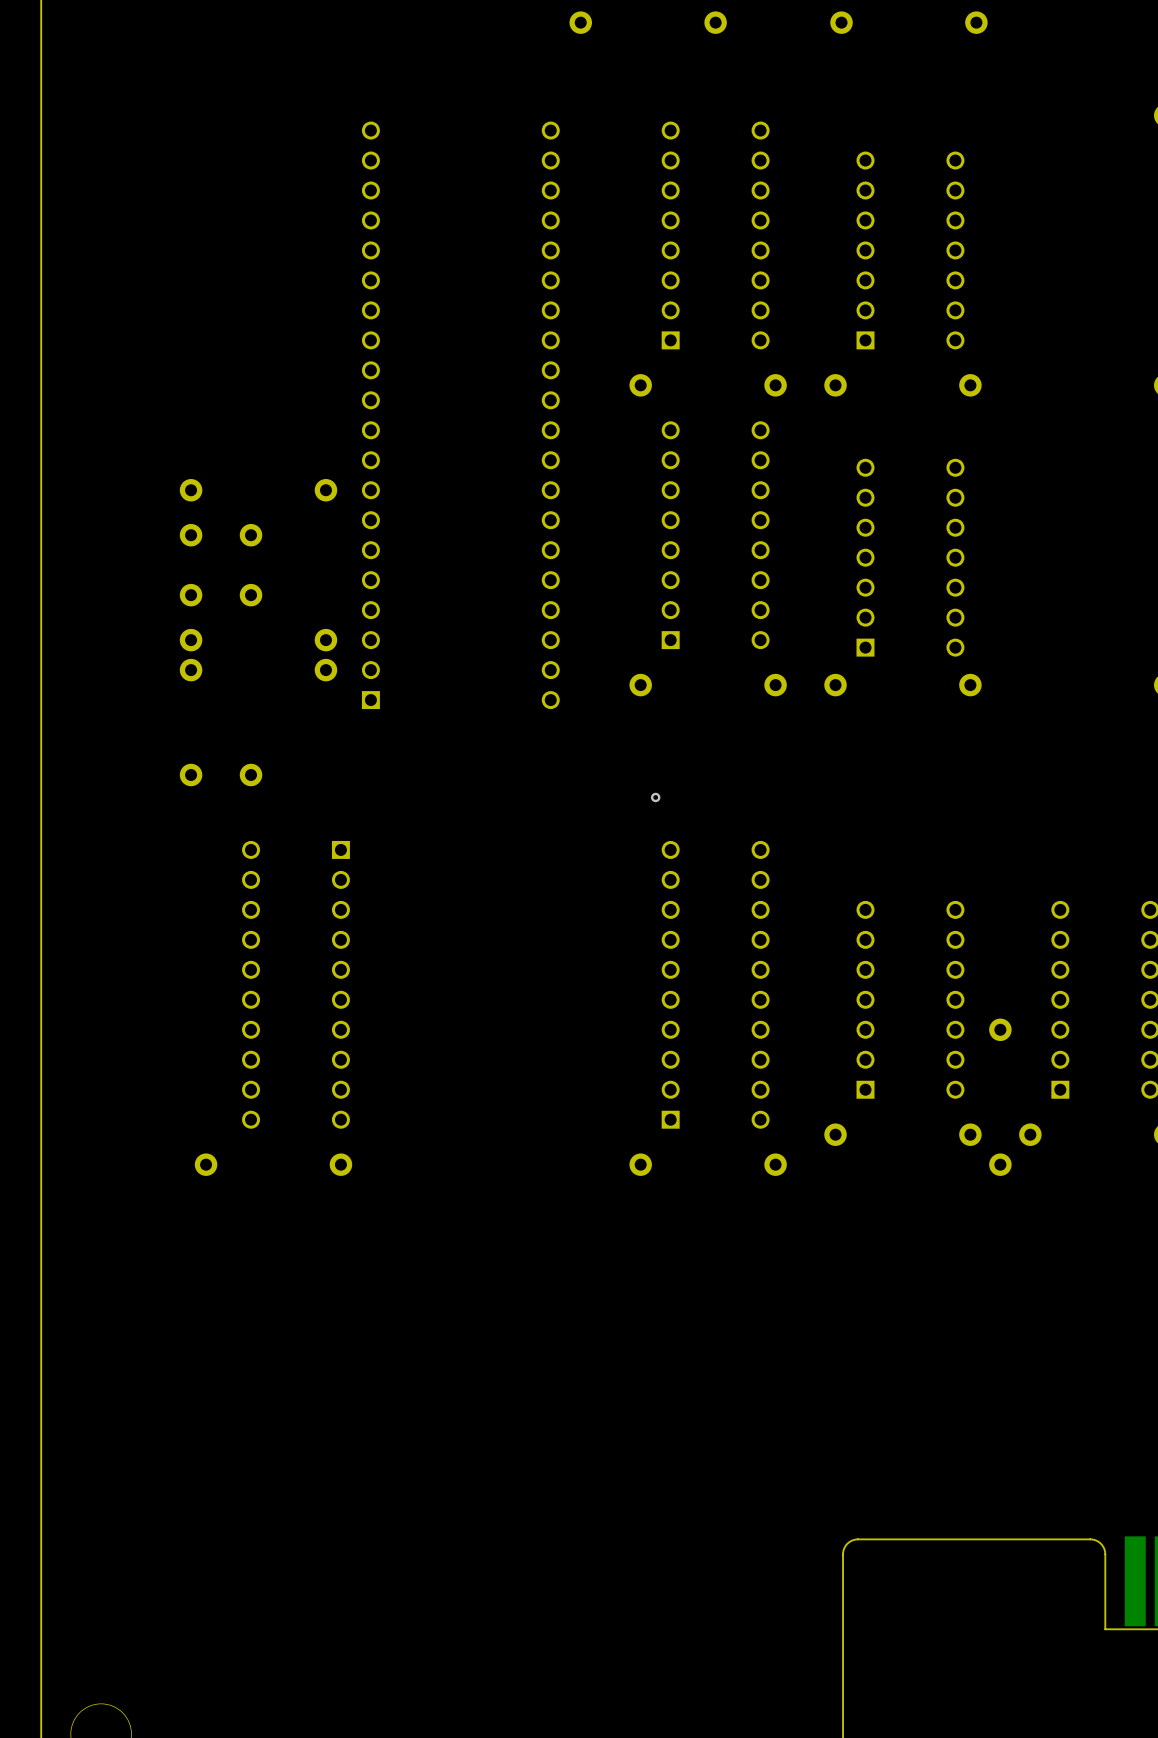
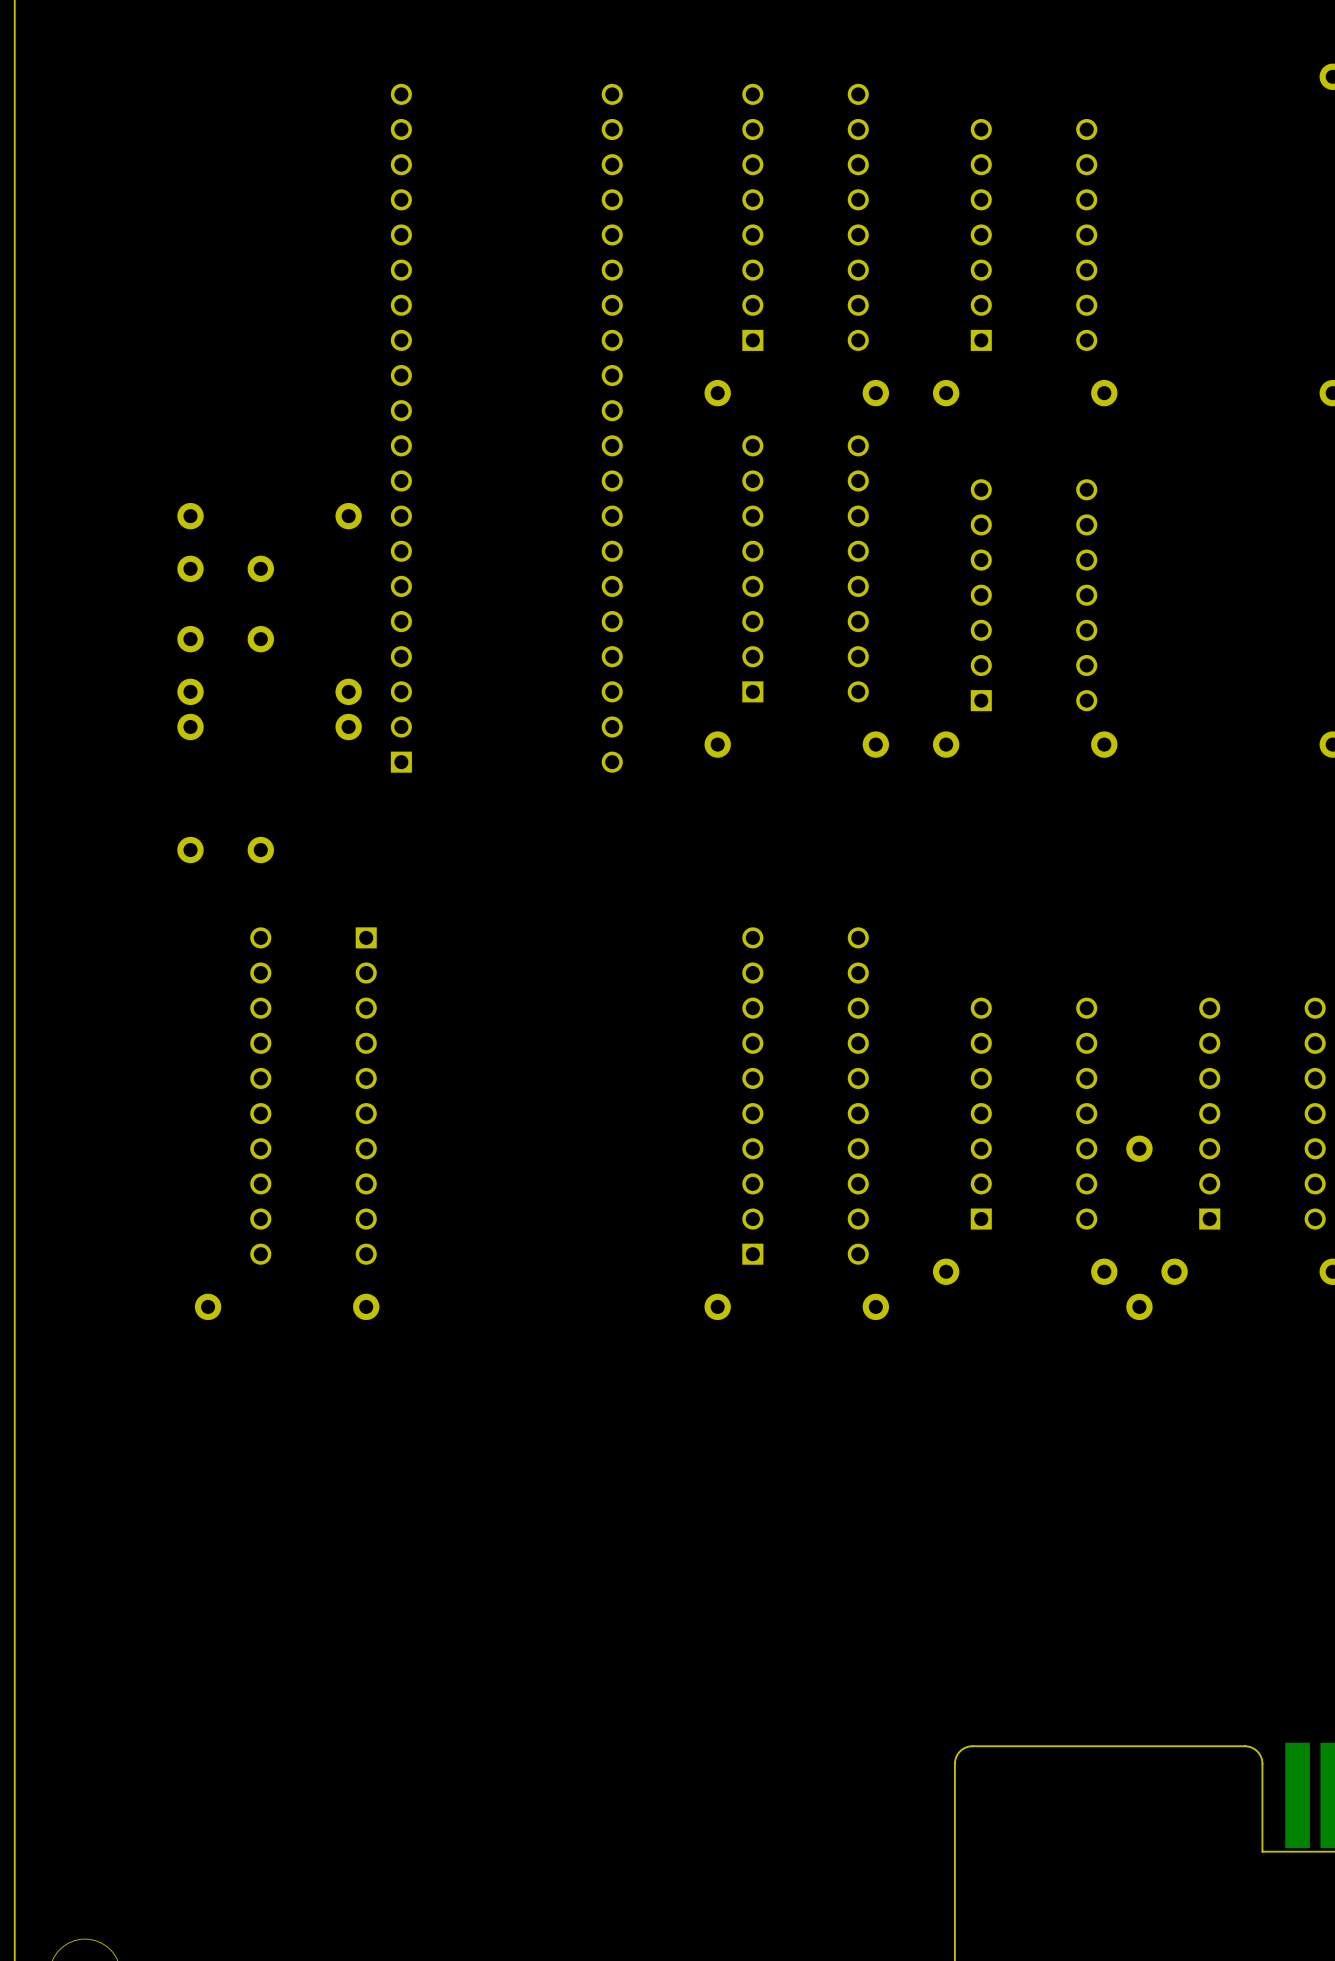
via: (655, 797) -> none

